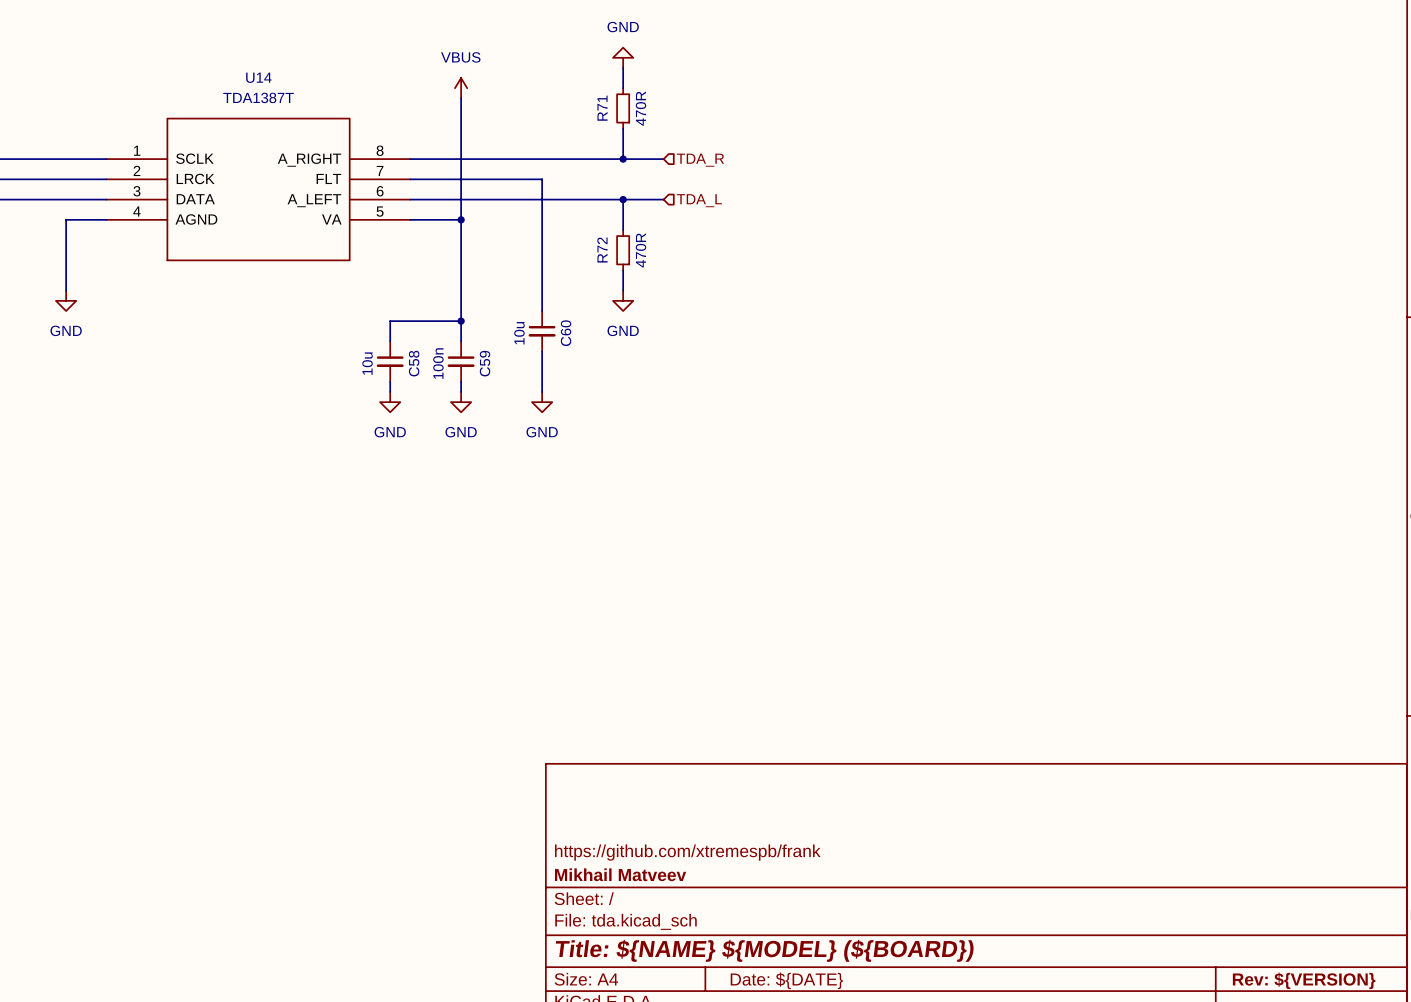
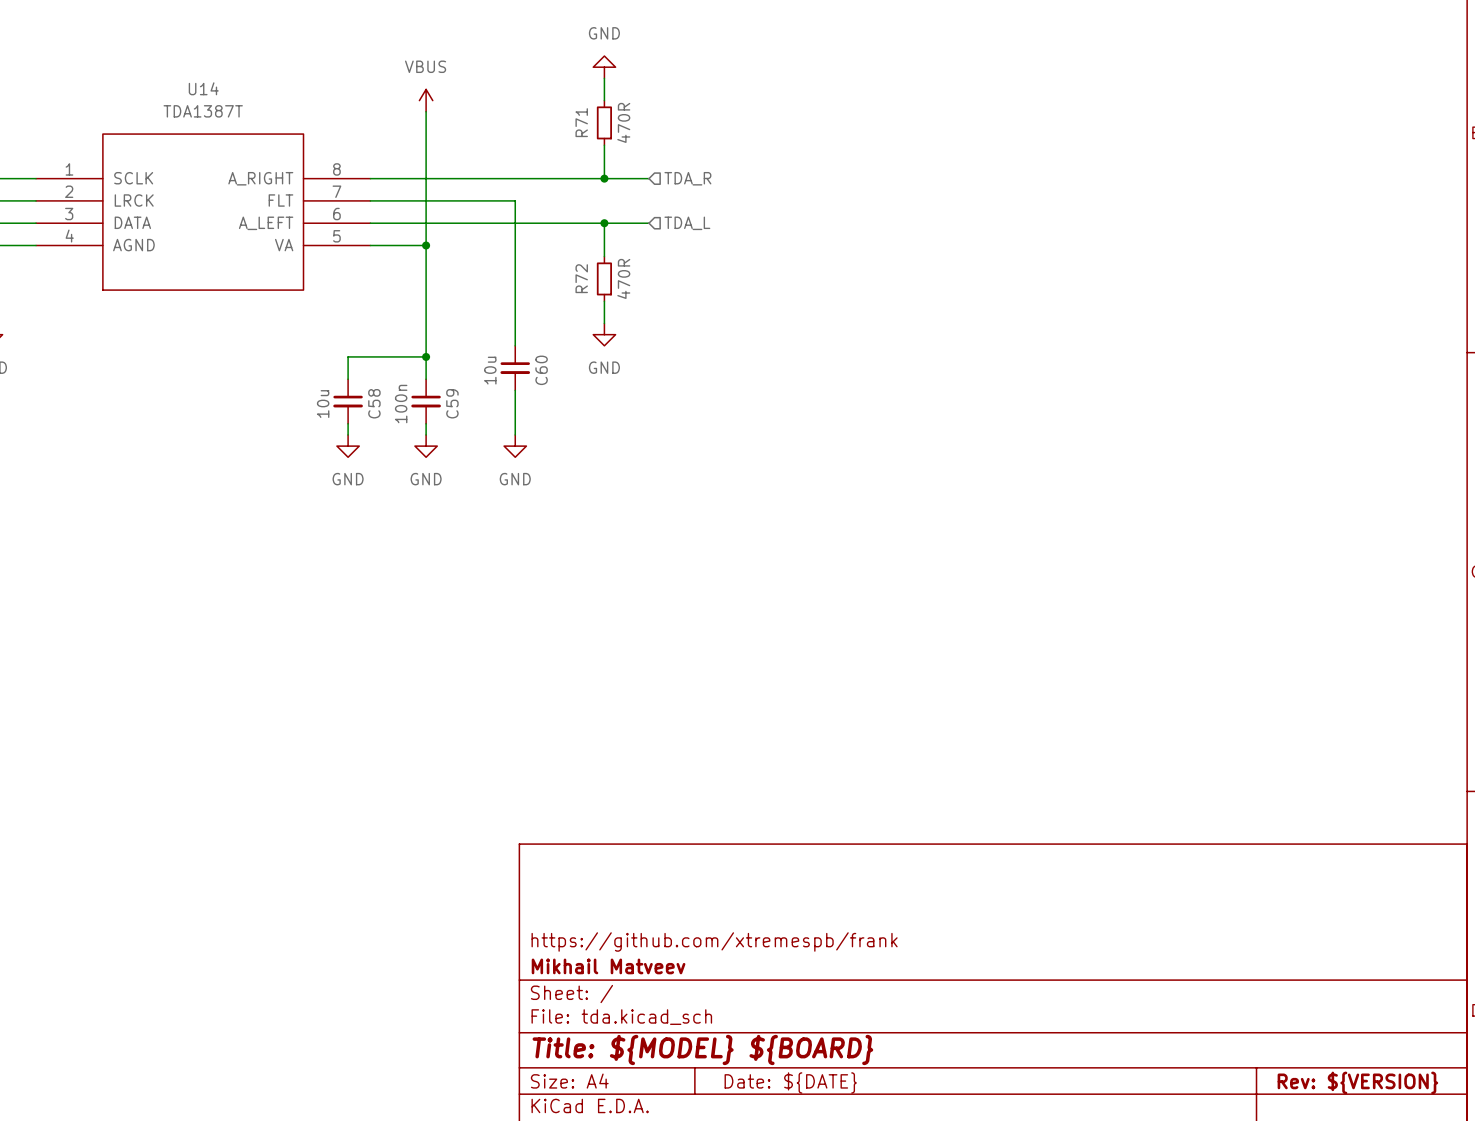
title block: Title: ${NAME} ${MODEL} (${BOARD}) (764, 950) -> Title: ${MODEL} ${BOARD} (702, 1049)

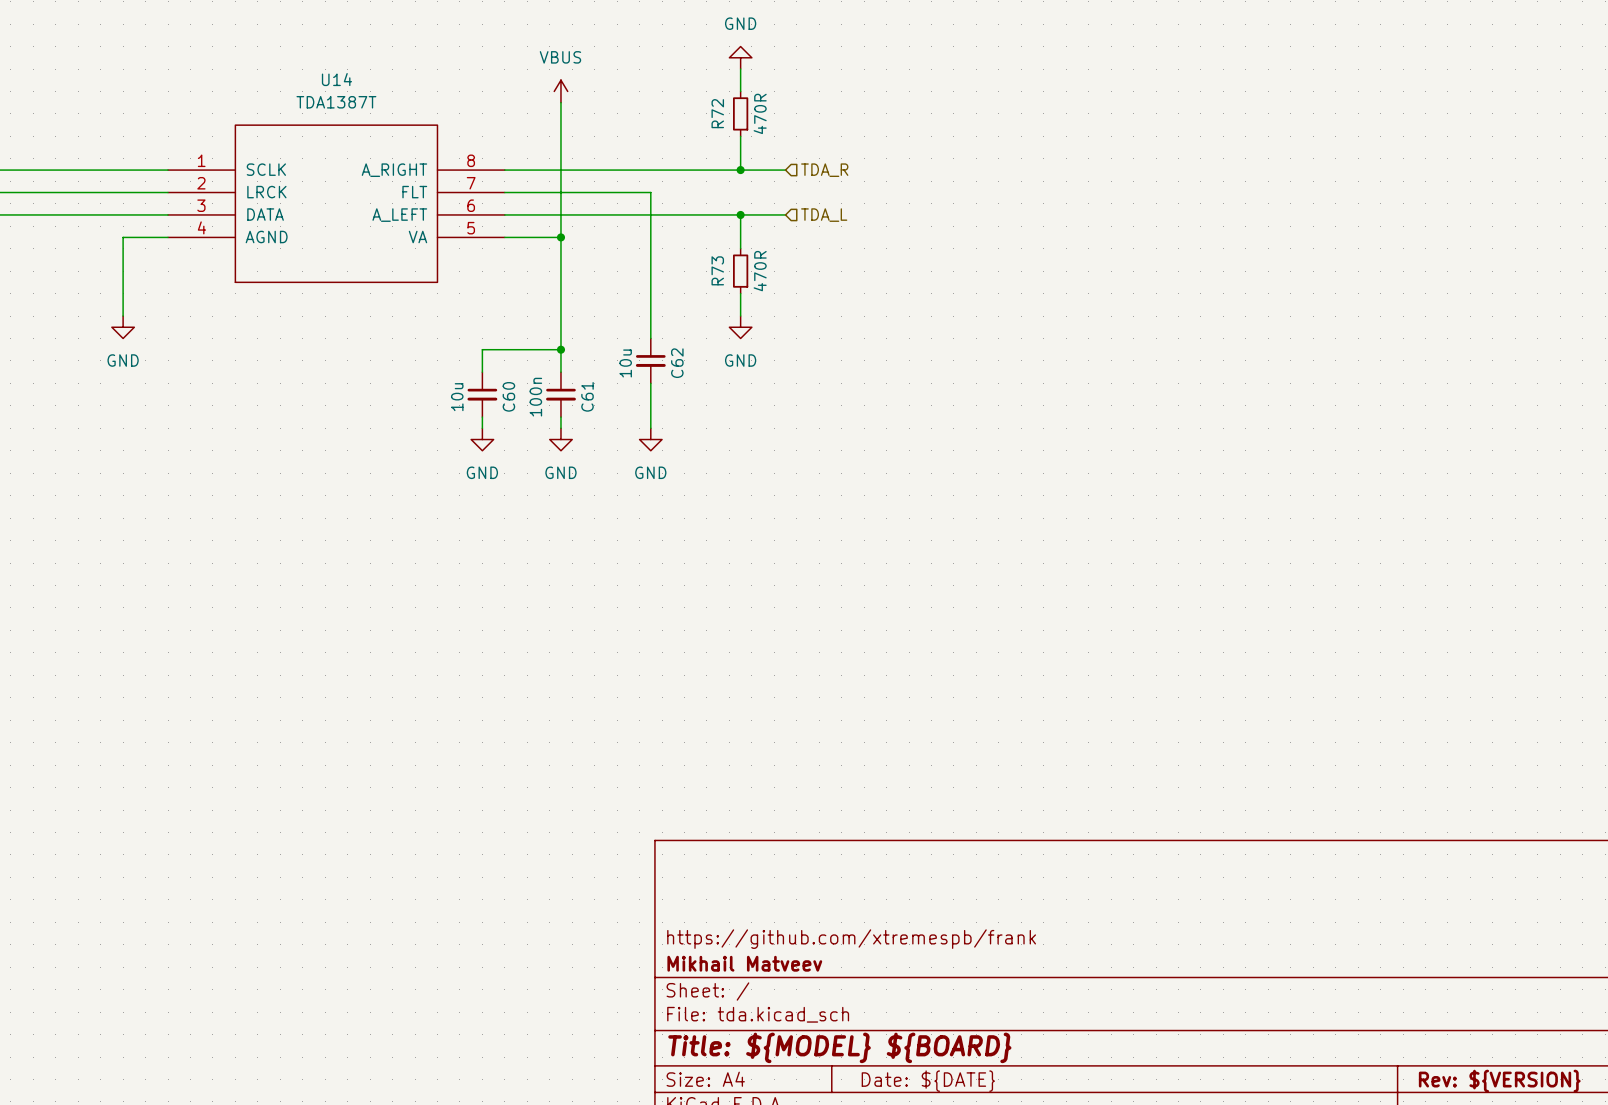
R71 name: R71 (581, 122) -> R72 (717, 113)
R72 name: R72 (581, 278) -> R73 (717, 270)
C60 name: C60 (541, 370) -> C62 (677, 363)
C58 name: C58 (374, 403) -> C60 (508, 396)
C59 name: C59 (452, 403) -> C61 (587, 396)

